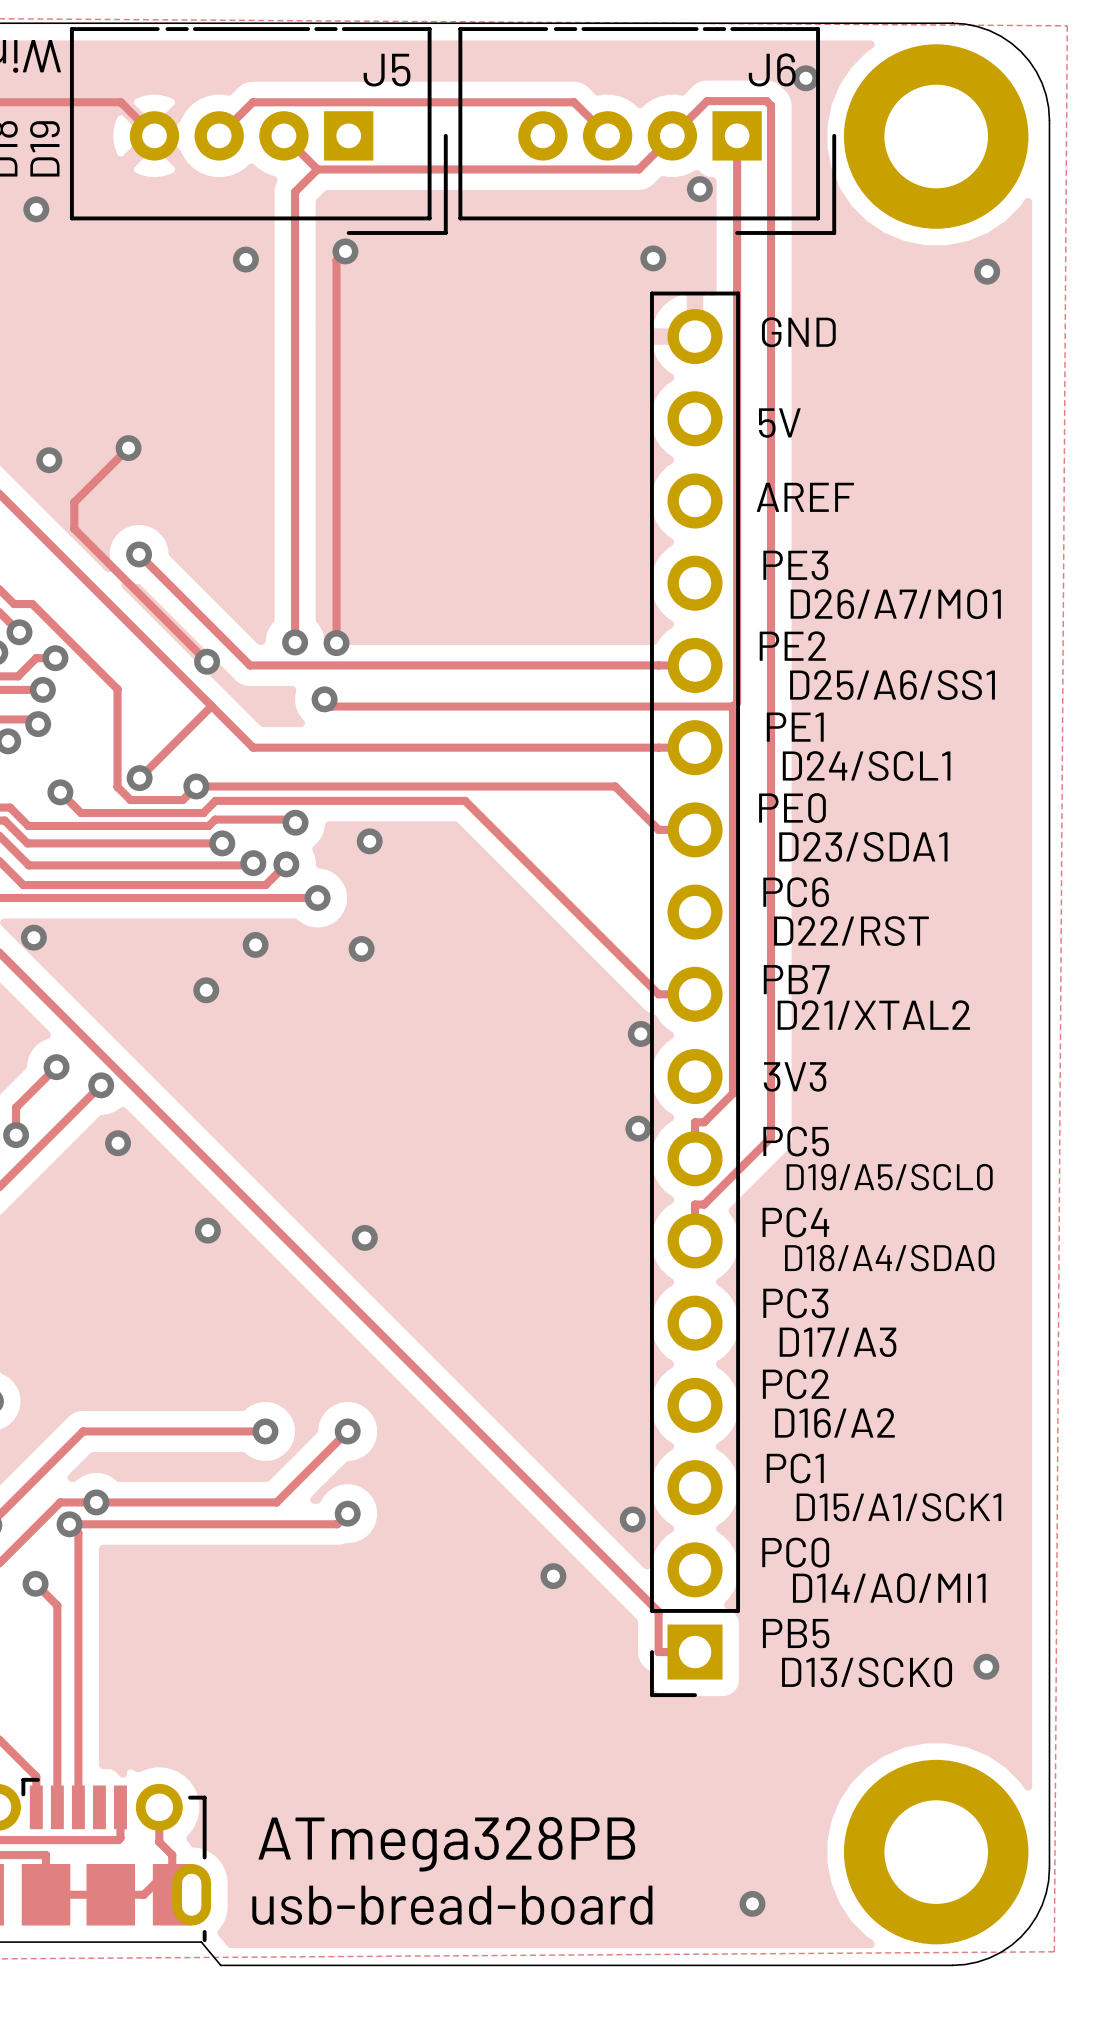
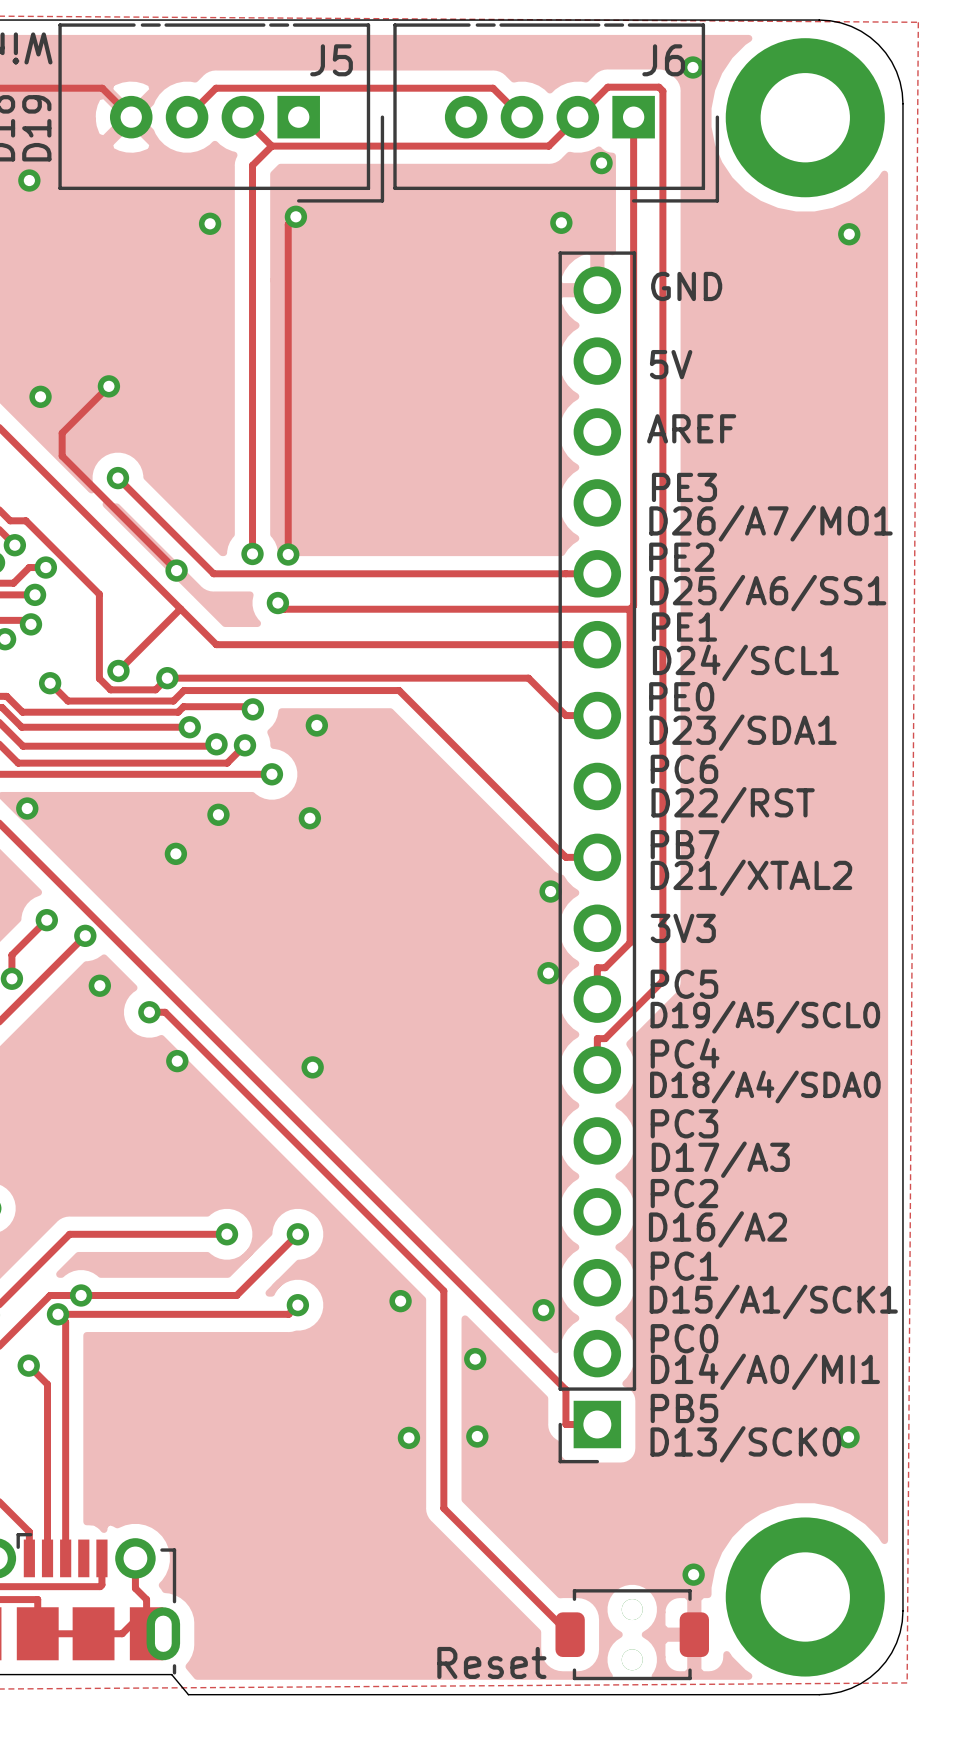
track: none -> (149, 1012) (165, 1012) (443, 1290) (443, 1508) (570, 1634)
via: none -> (149, 1012)
via: none -> (400, 1301)
via: none -> (477, 1436)
via: none -> (408, 1437)
text: ATmega328PB (446, 1844) -> none
part: none -> (632, 1634)
via position: (752, 1903) -> (693, 1574)
text: usb-bread-board (452, 1905) -> none
text: none -> Reset (491, 1662)

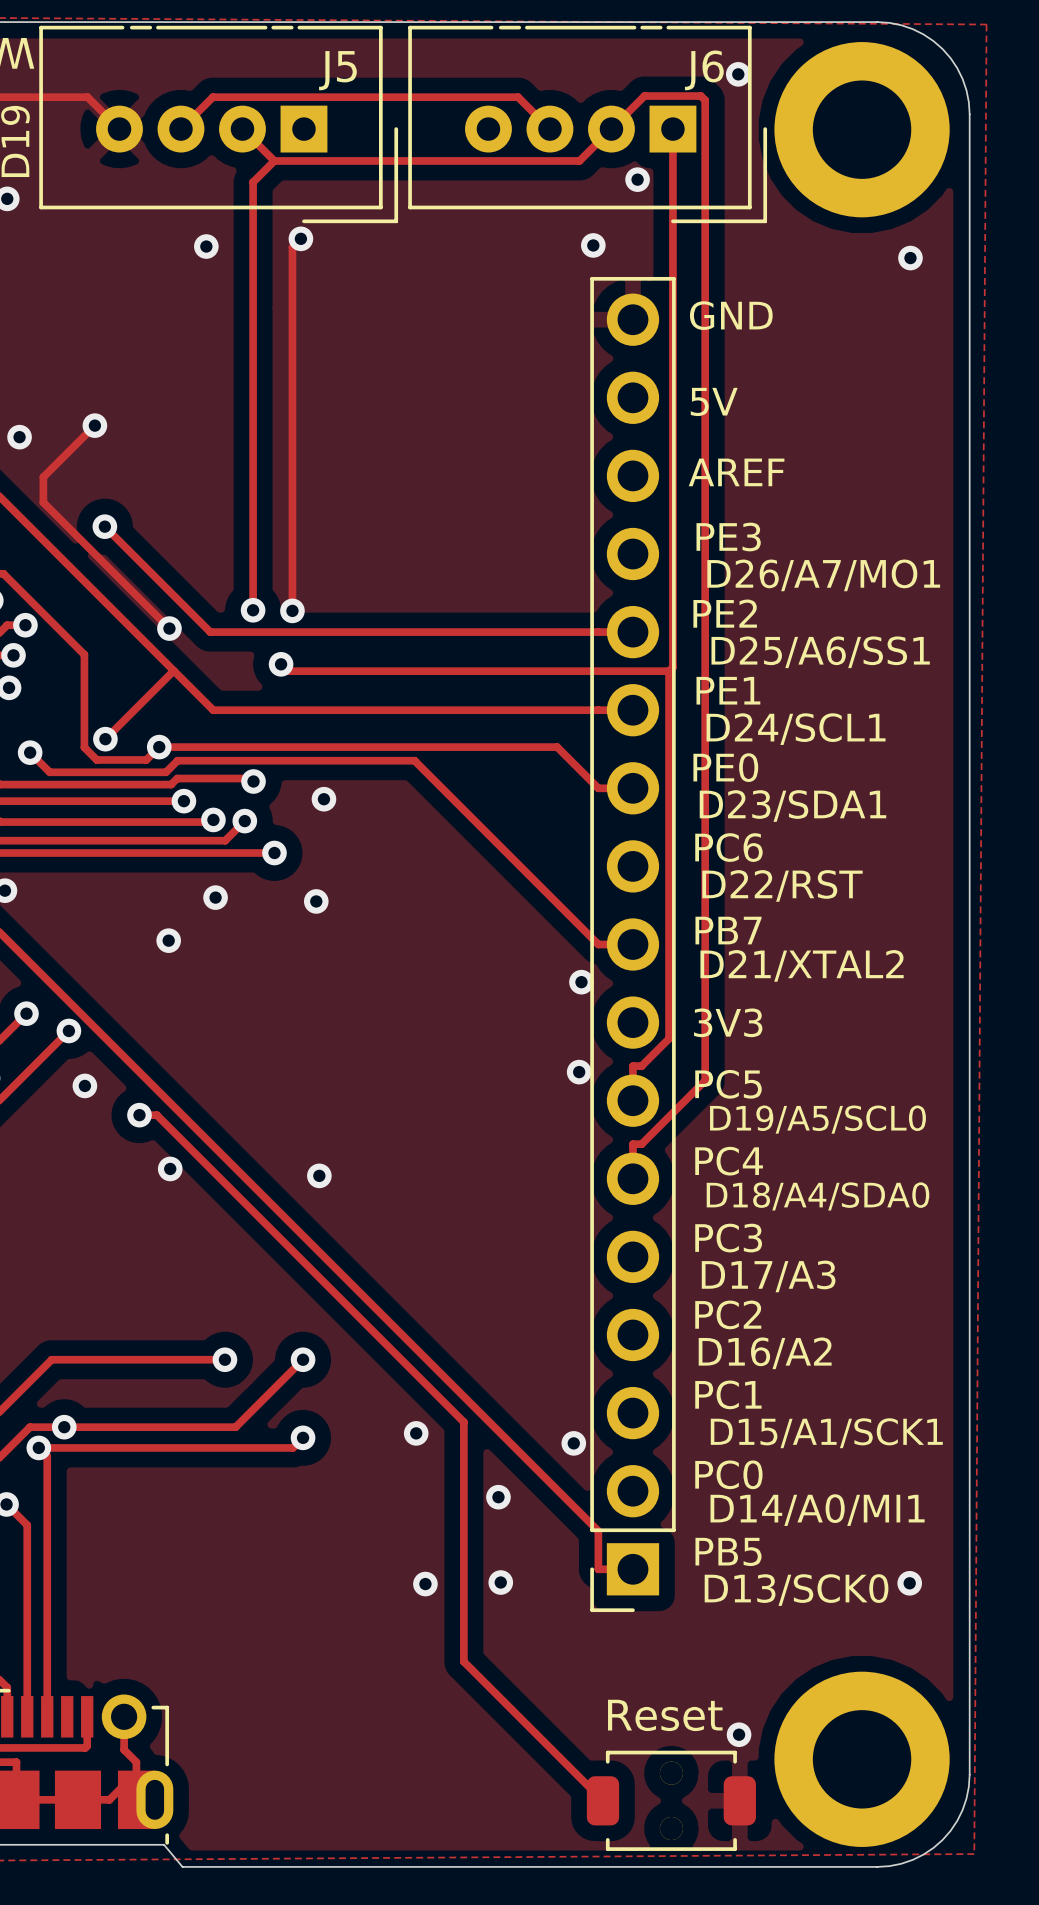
text position: Reset (491, 1662) -> Reset (665, 1715)

